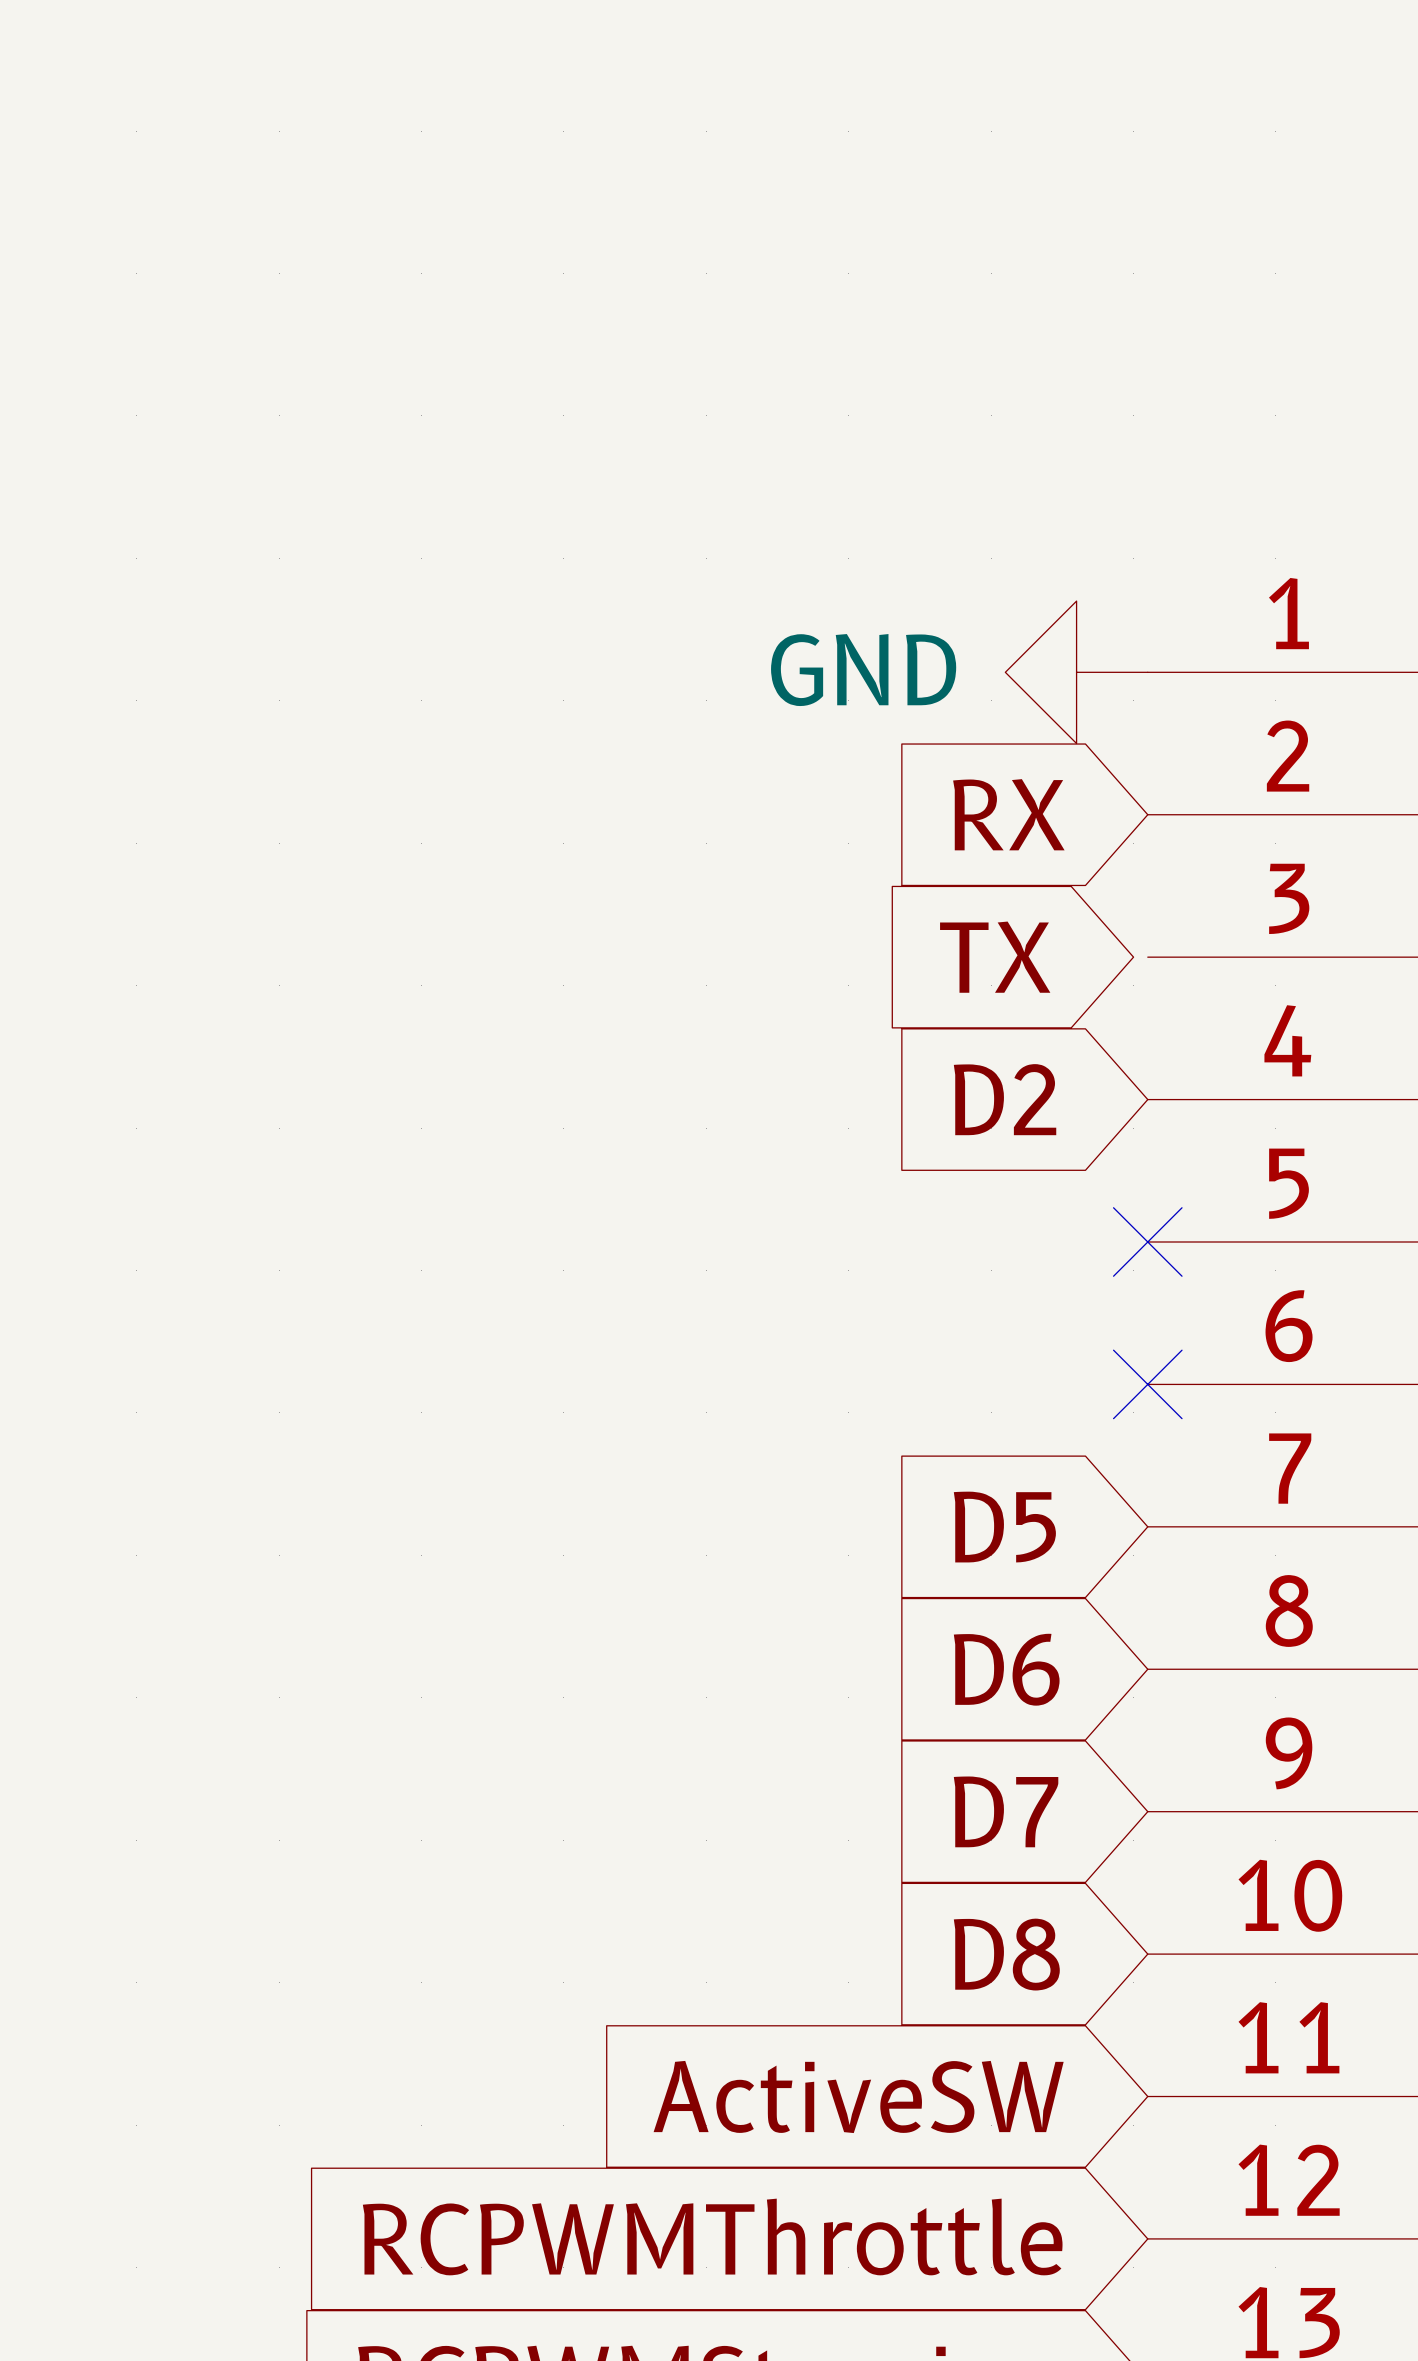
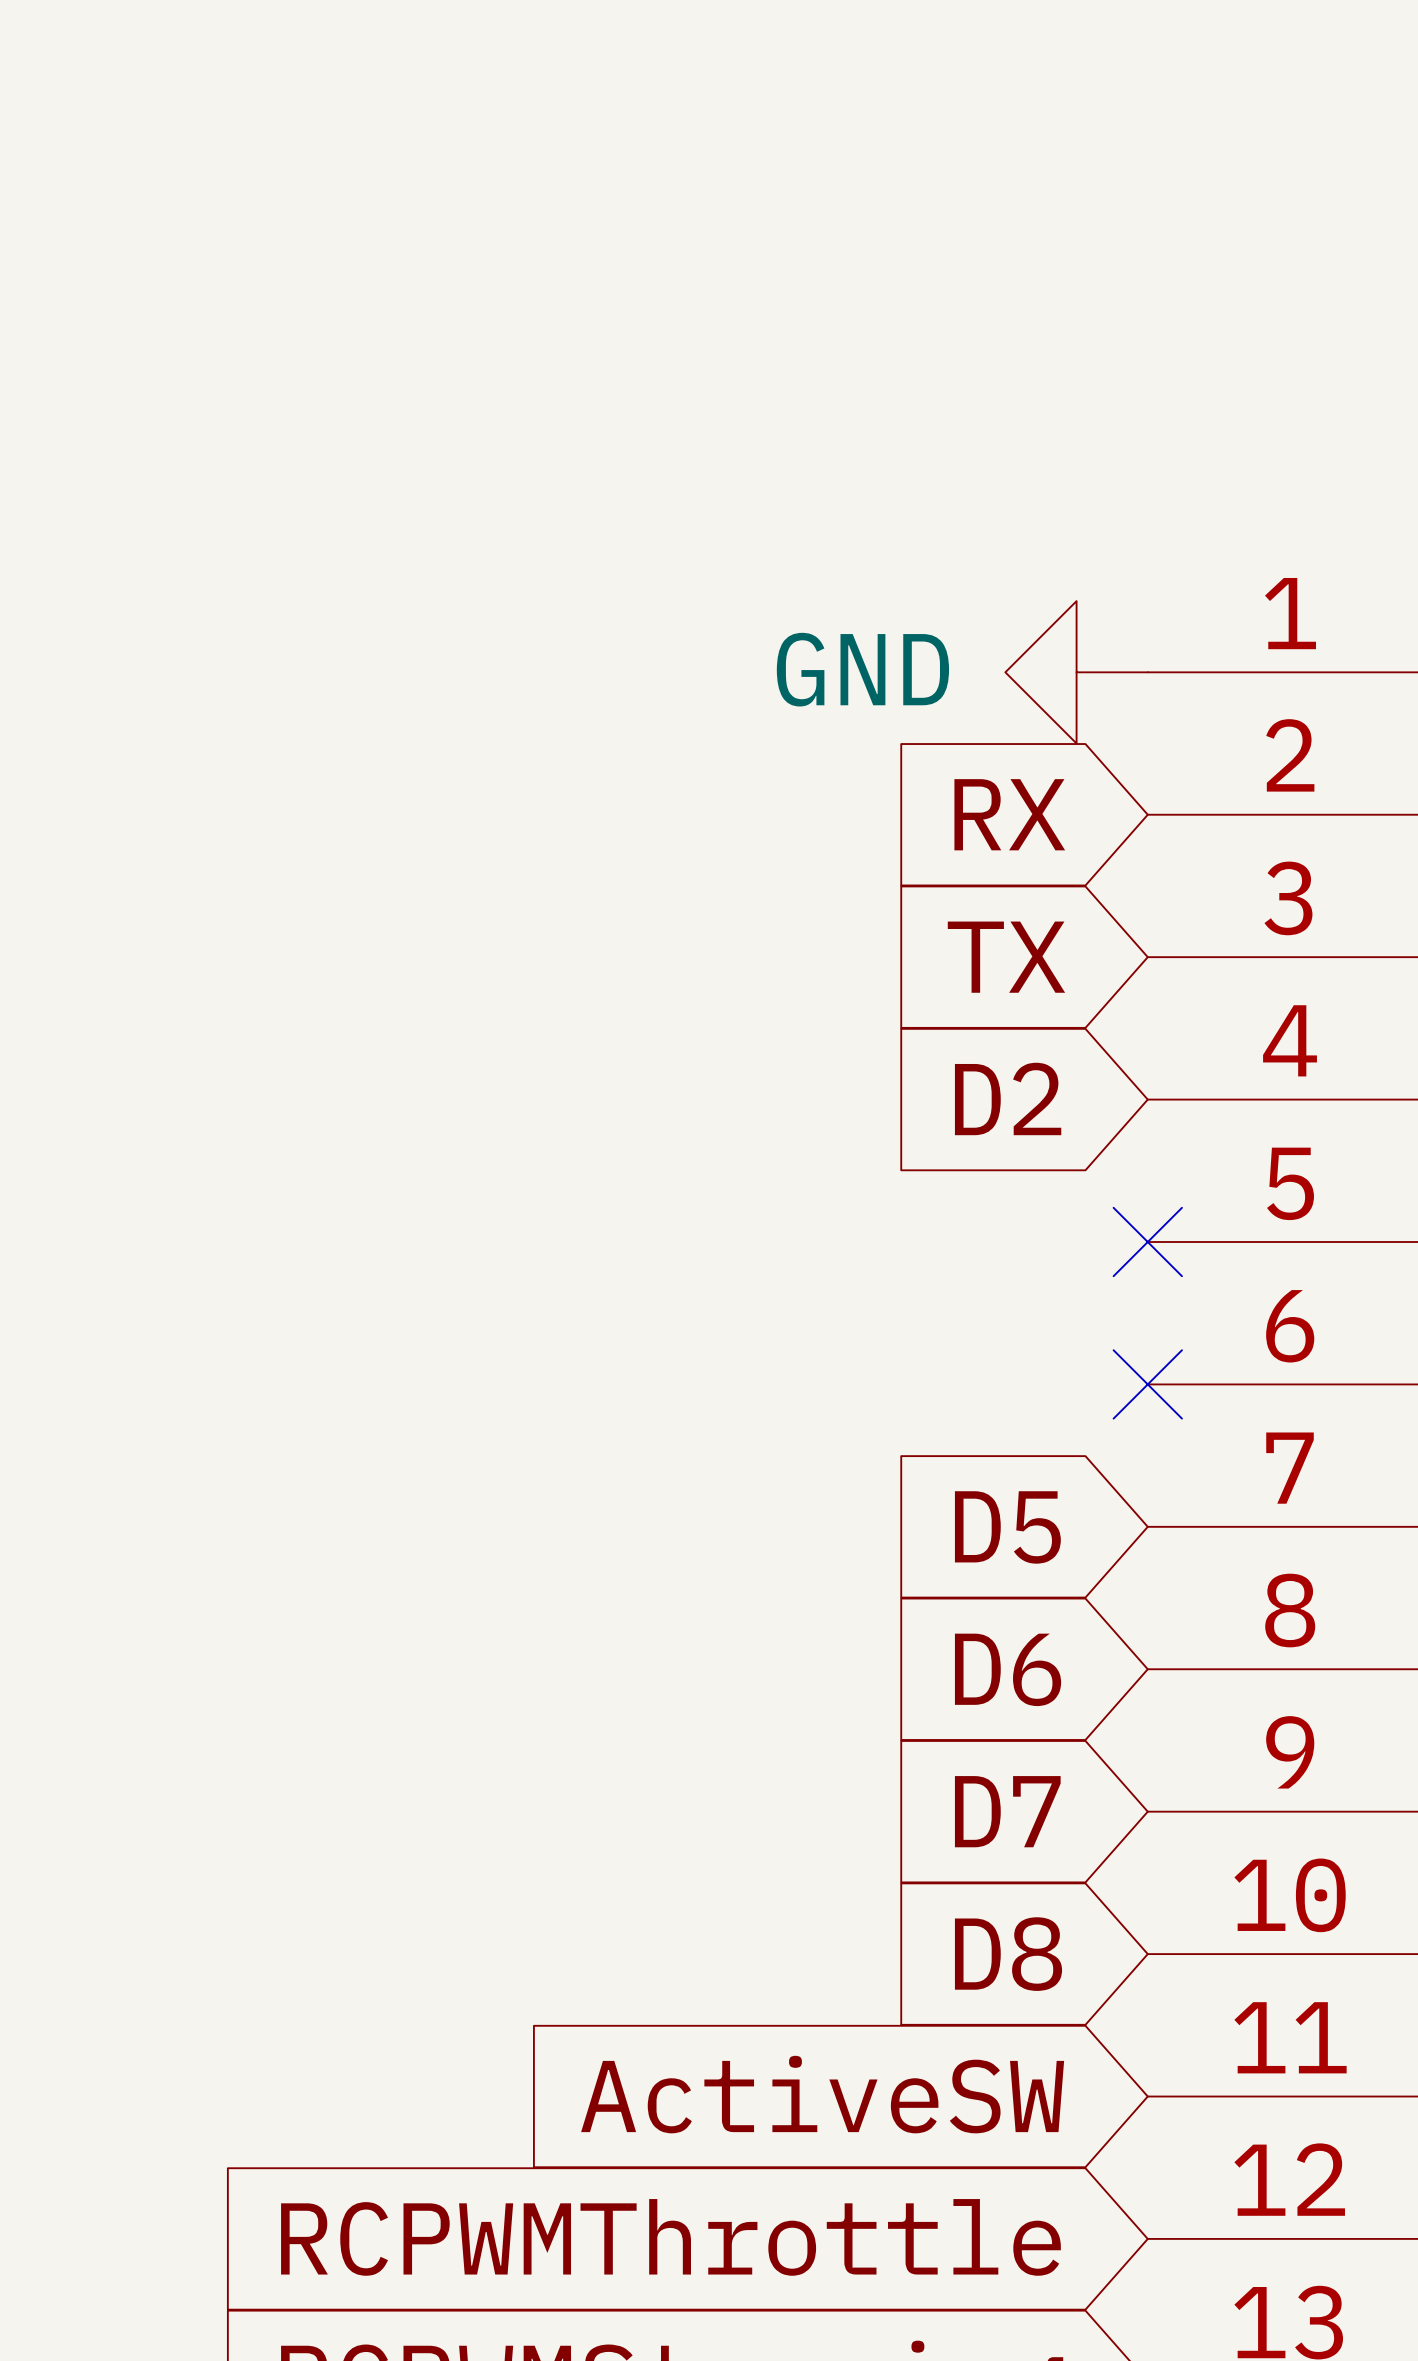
global label position: TX (995, 957) -> TX (1006, 957)

